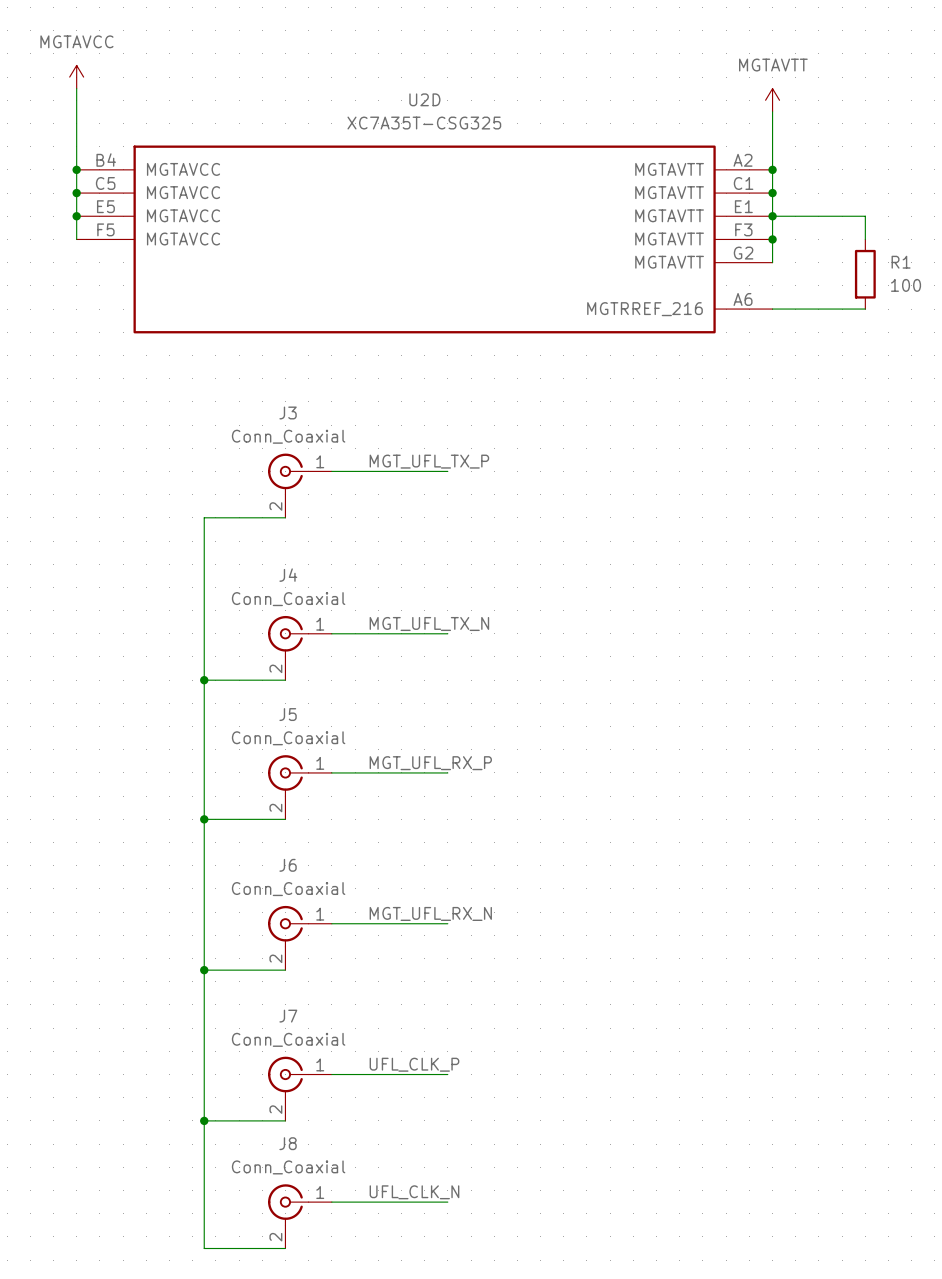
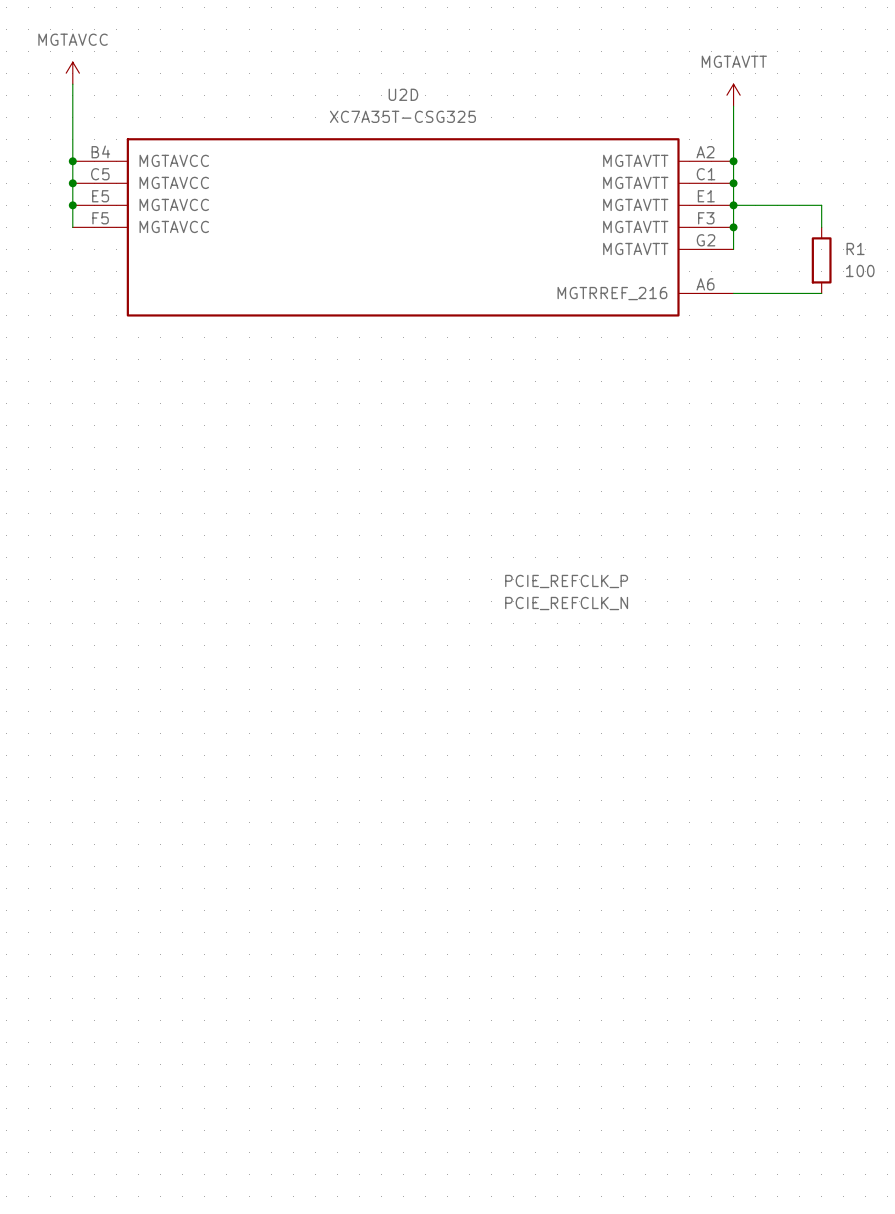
label: MGT_UFL_TX_P (429, 461) -> none
wire: (331, 471) (447, 471) -> none
J3: Conn_Coaxial (299, 485) -> none
wire: (285, 517) (204, 517) (204, 1248) (285, 1248) -> none
label: none -> PCIE_REFCLK_P (566, 581)
label: MGT_UFL_TX_N (429, 623) -> none
wire: (331, 633) (447, 633) -> none
label: none -> PCIE_REFCLK_N (566, 603)
J4: Conn_Coaxial (299, 648) -> none
wire: (204, 680) (285, 680) -> none
junction: (204, 680) -> none
label: MGT_UFL_RX_P (430, 763) -> none
wire: (331, 772) (447, 772) -> none
J5: Conn_Coaxial (299, 787) -> none
wire: (204, 819) (285, 819) -> none
junction: (204, 819) -> none
label: MGT_UFL_RX_N (430, 913) -> none
wire: (331, 923) (447, 923) -> none
J6: Conn_Coaxial (299, 938) -> none
wire: (204, 970) (285, 970) -> none
junction: (204, 970) -> none
label: UFL_CLK_P (414, 1064) -> none
wire: (331, 1074) (447, 1074) -> none
J7: Conn_Coaxial (299, 1088) -> none
wire: (204, 1120) (285, 1120) -> none
junction: (204, 1120) -> none
label: UFL_CLK_N (414, 1192) -> none
wire: (331, 1202) (447, 1202) -> none
J8: Conn_Coaxial (299, 1216) -> none

